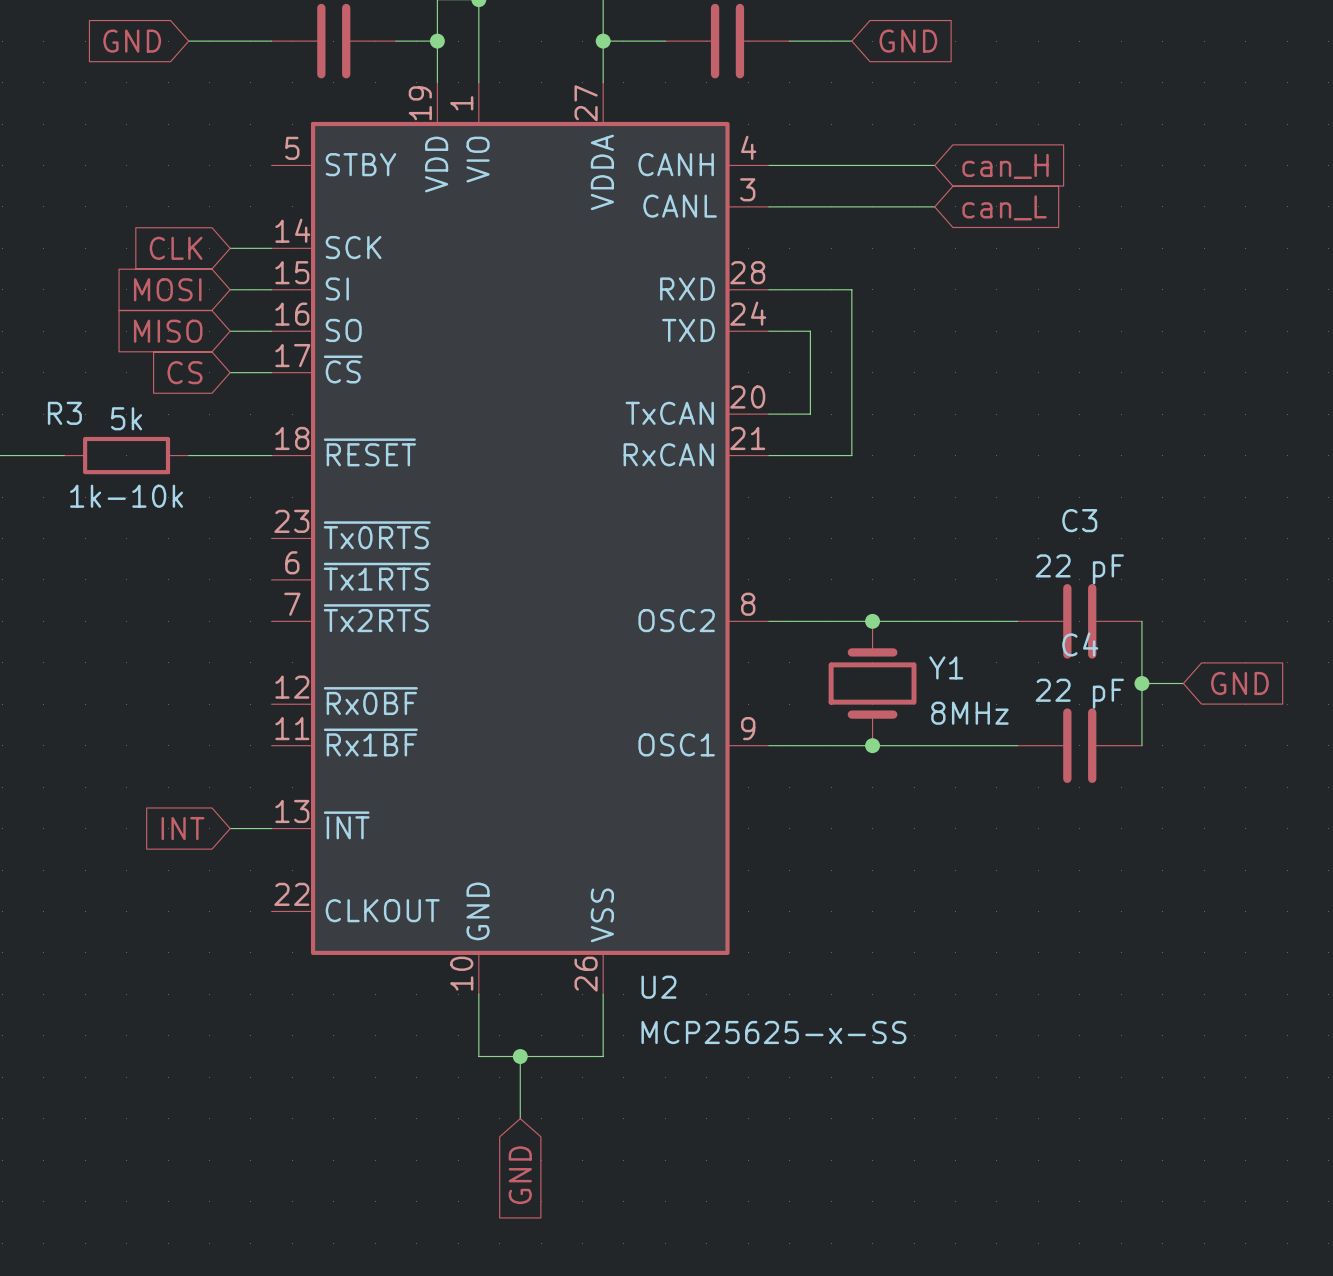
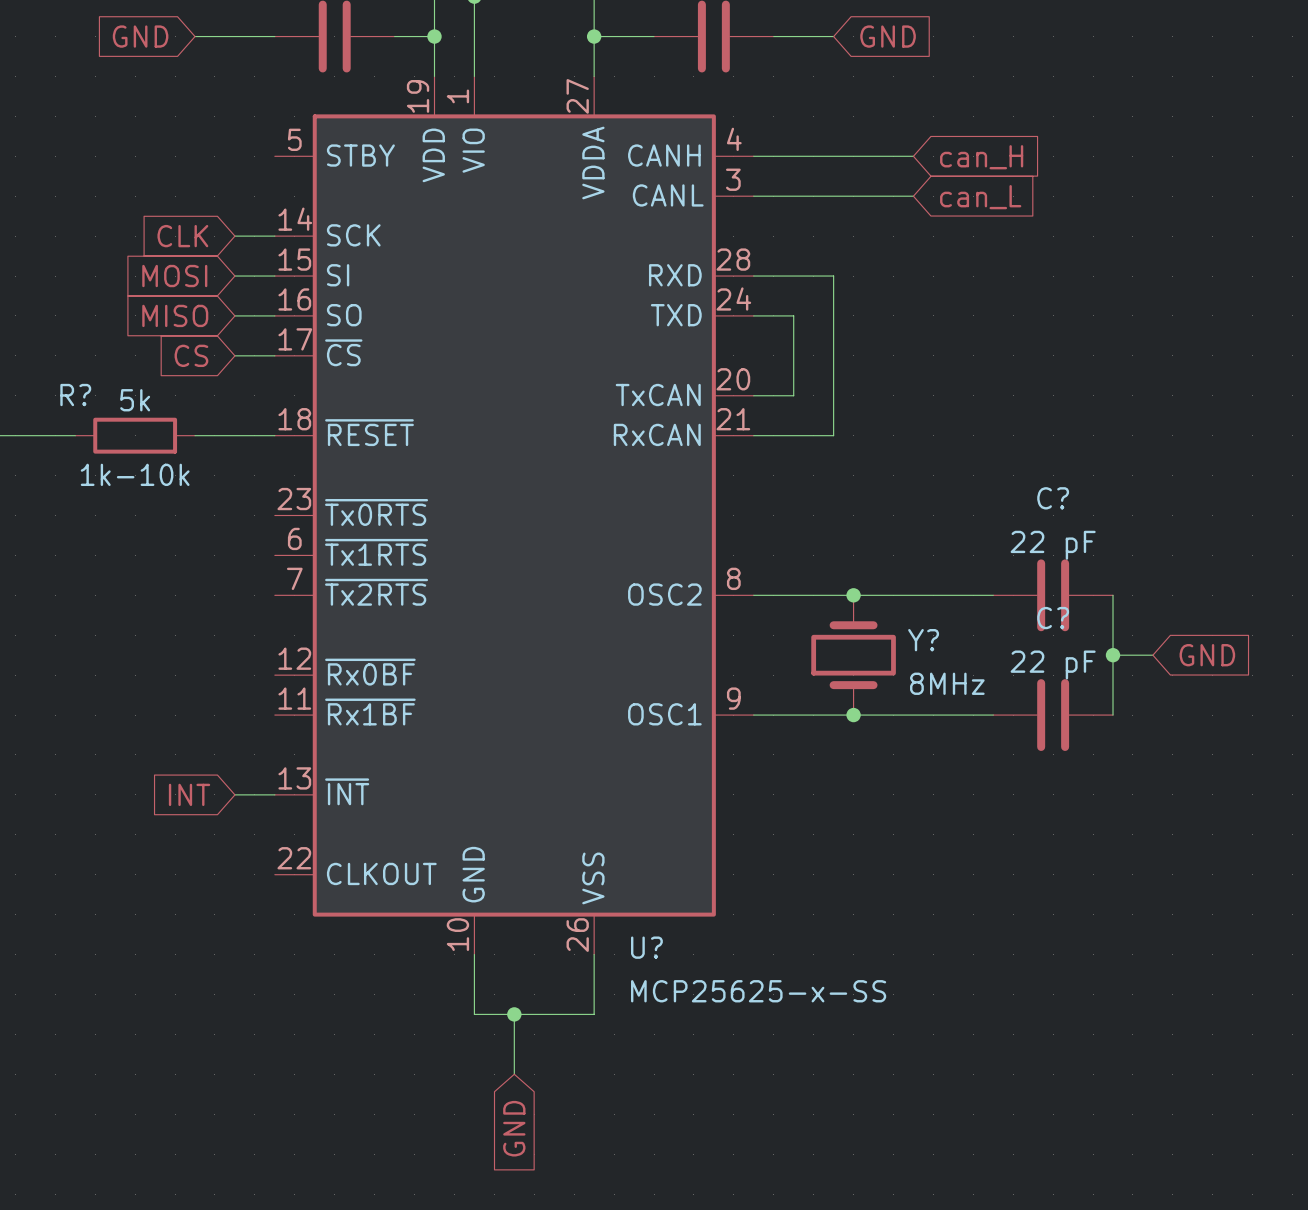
R3 name: R3 (64, 413) -> R? (75, 395)
C3 name: C3 (1079, 520) -> C? (1053, 498)
C4 name: C4 (1080, 644) -> C? (1053, 618)
Y1 name: Y1 (946, 667) -> Y? (923, 640)
U2 name: U2 (658, 987) -> U? (646, 947)

